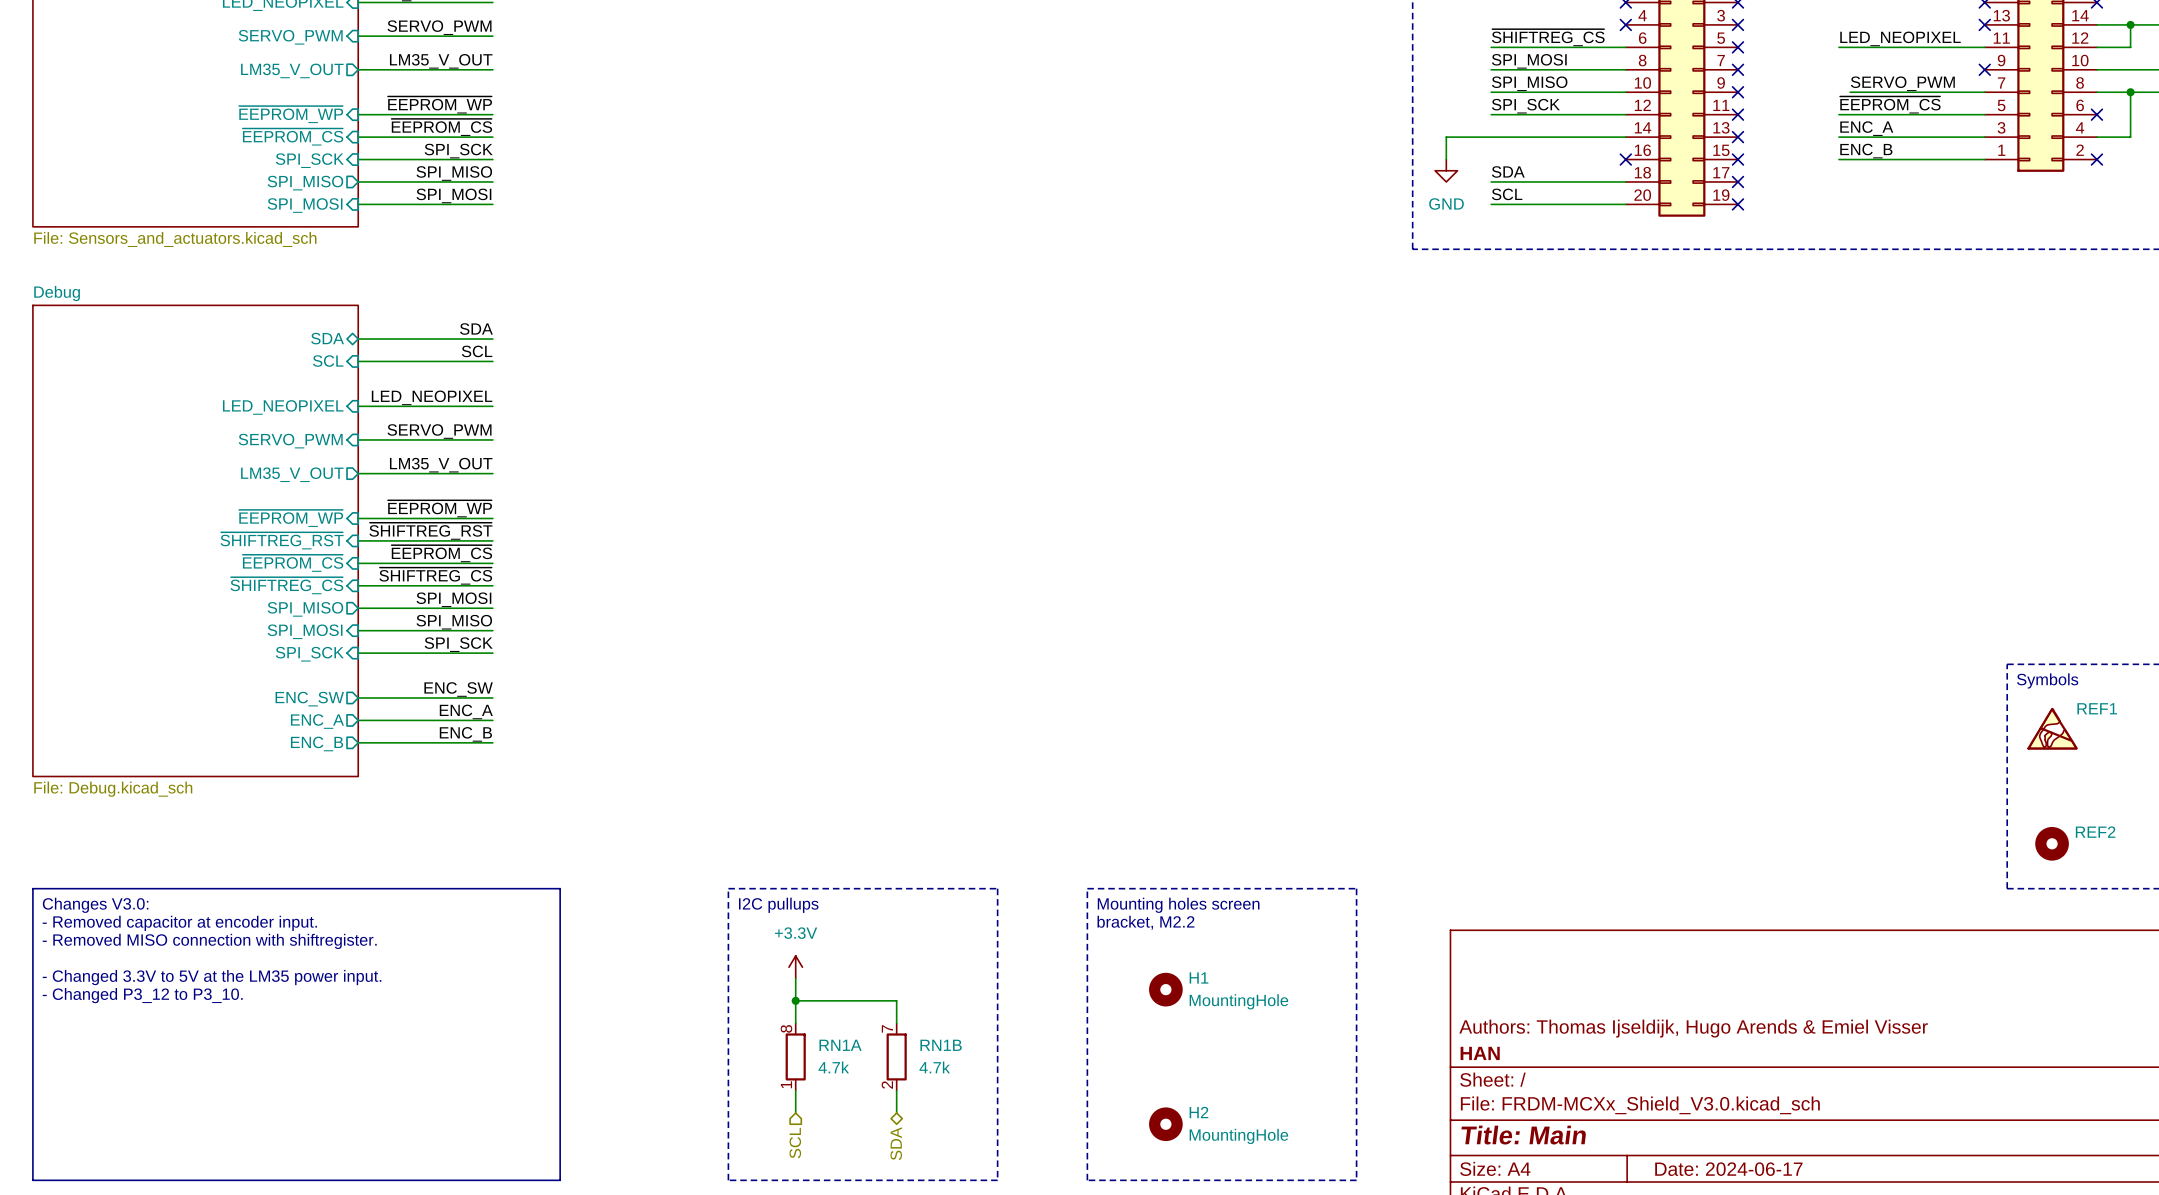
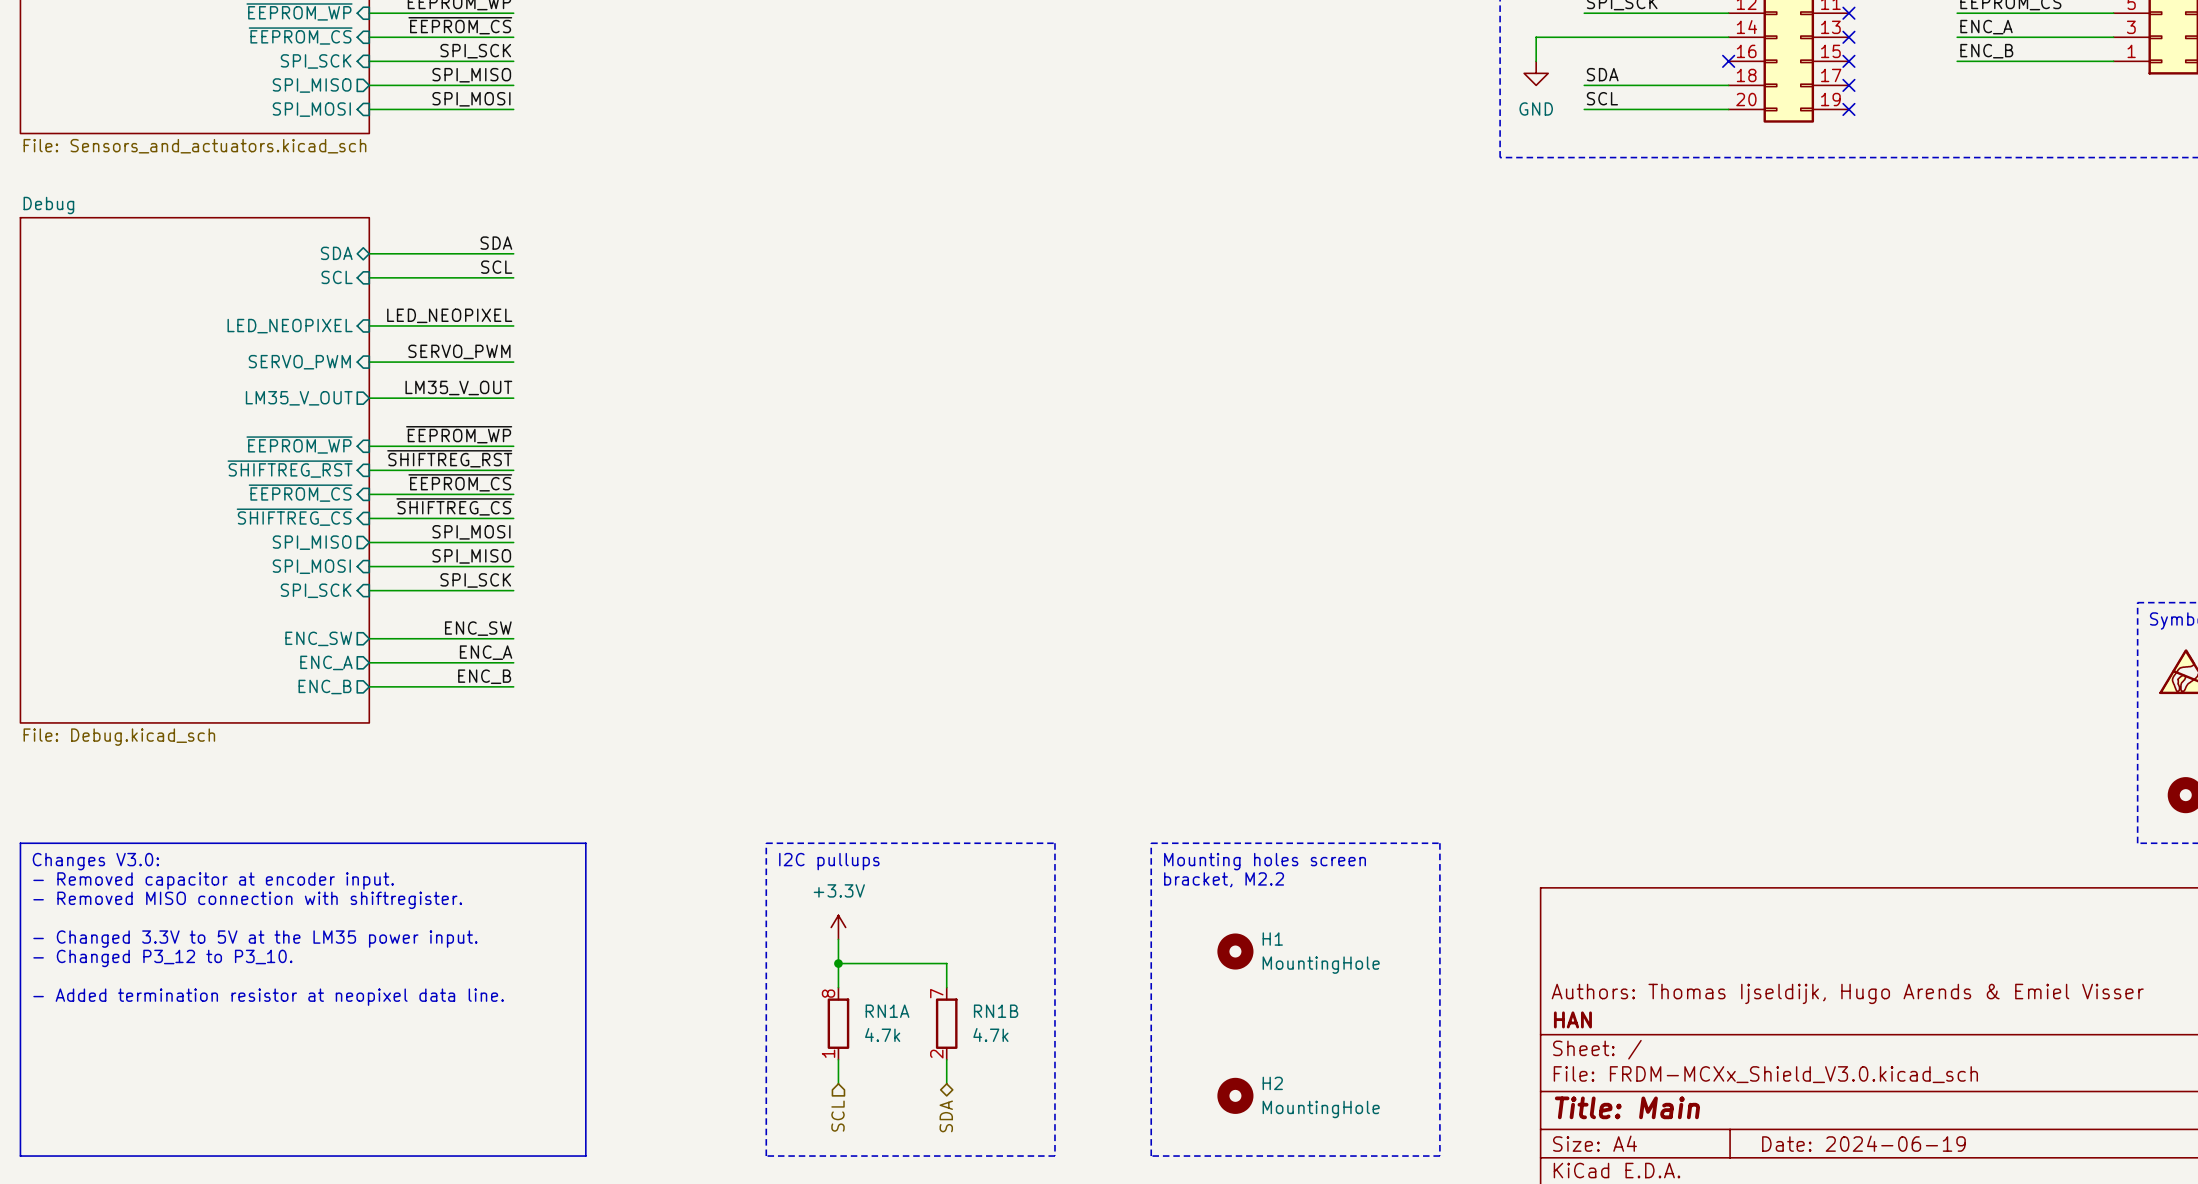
text: none -> - Added termination resistor at neopixel data line. (268, 997)
title block: Date: 2024-06-17 (1728, 1169) -> Date: 2024-06-19 (1863, 1143)

